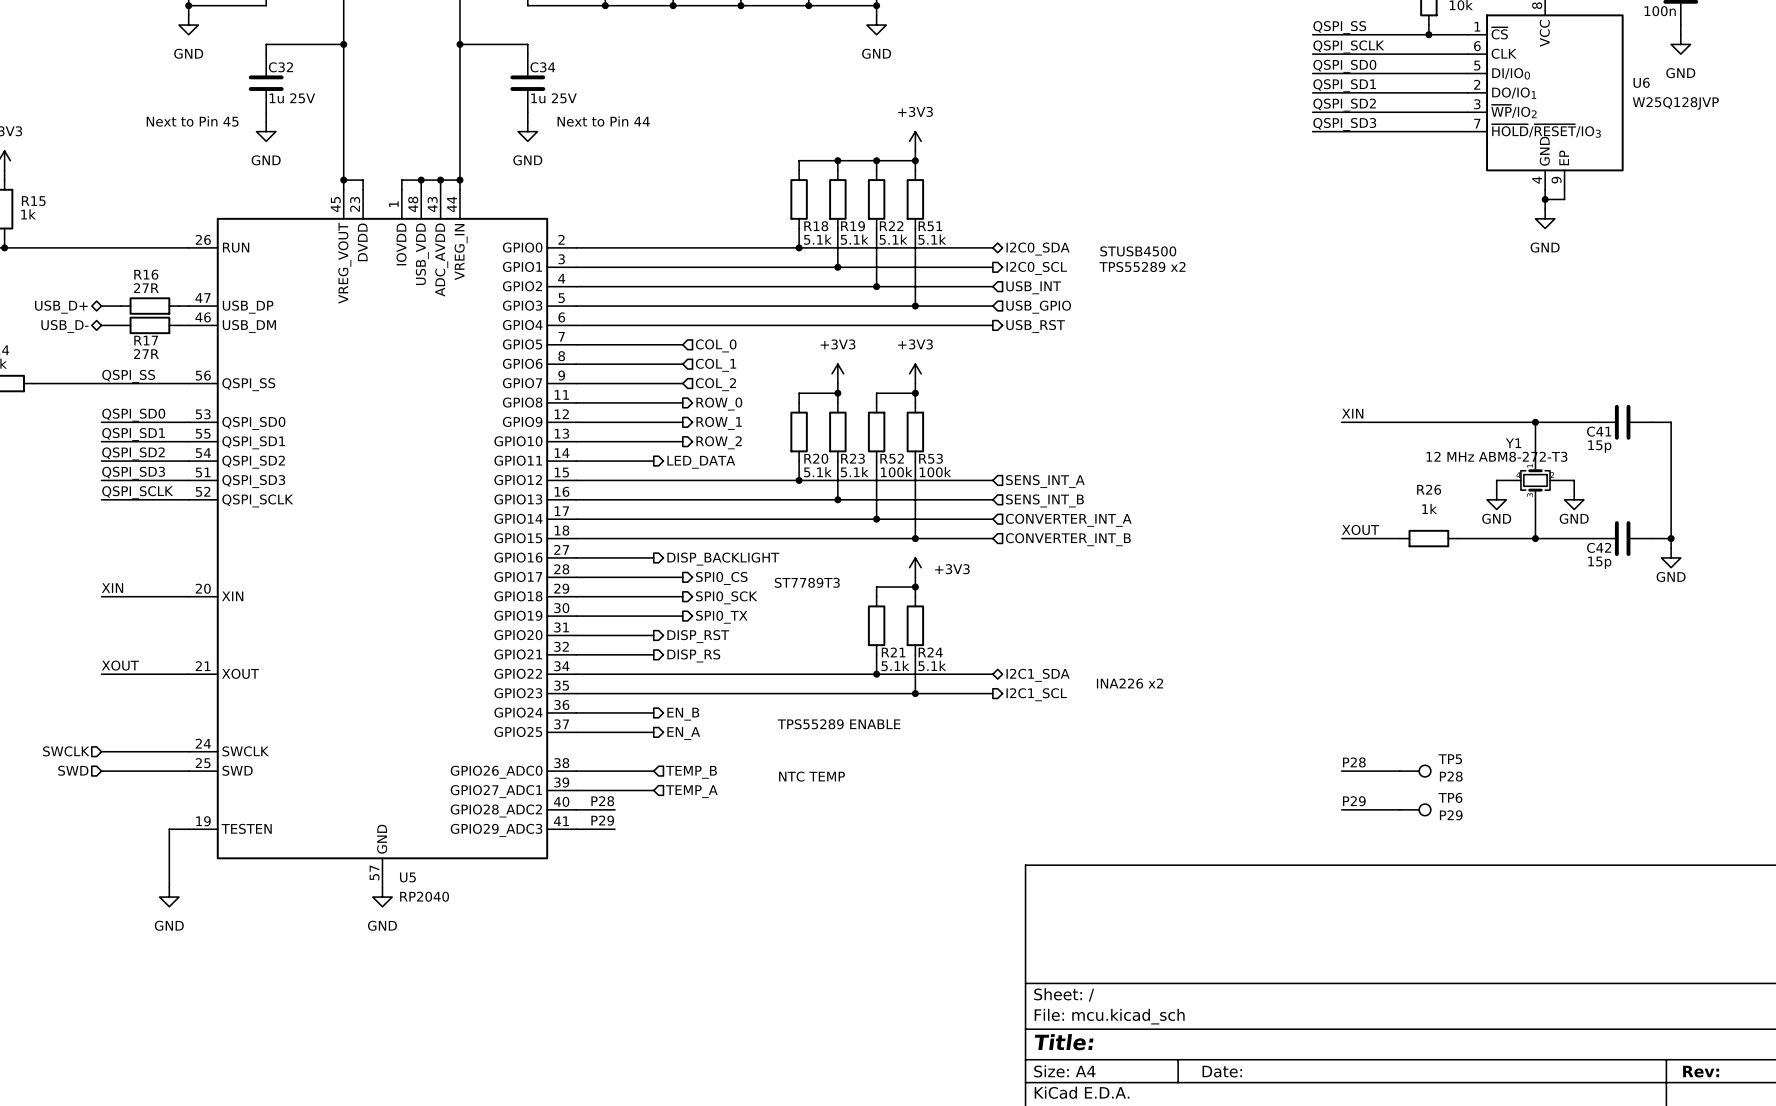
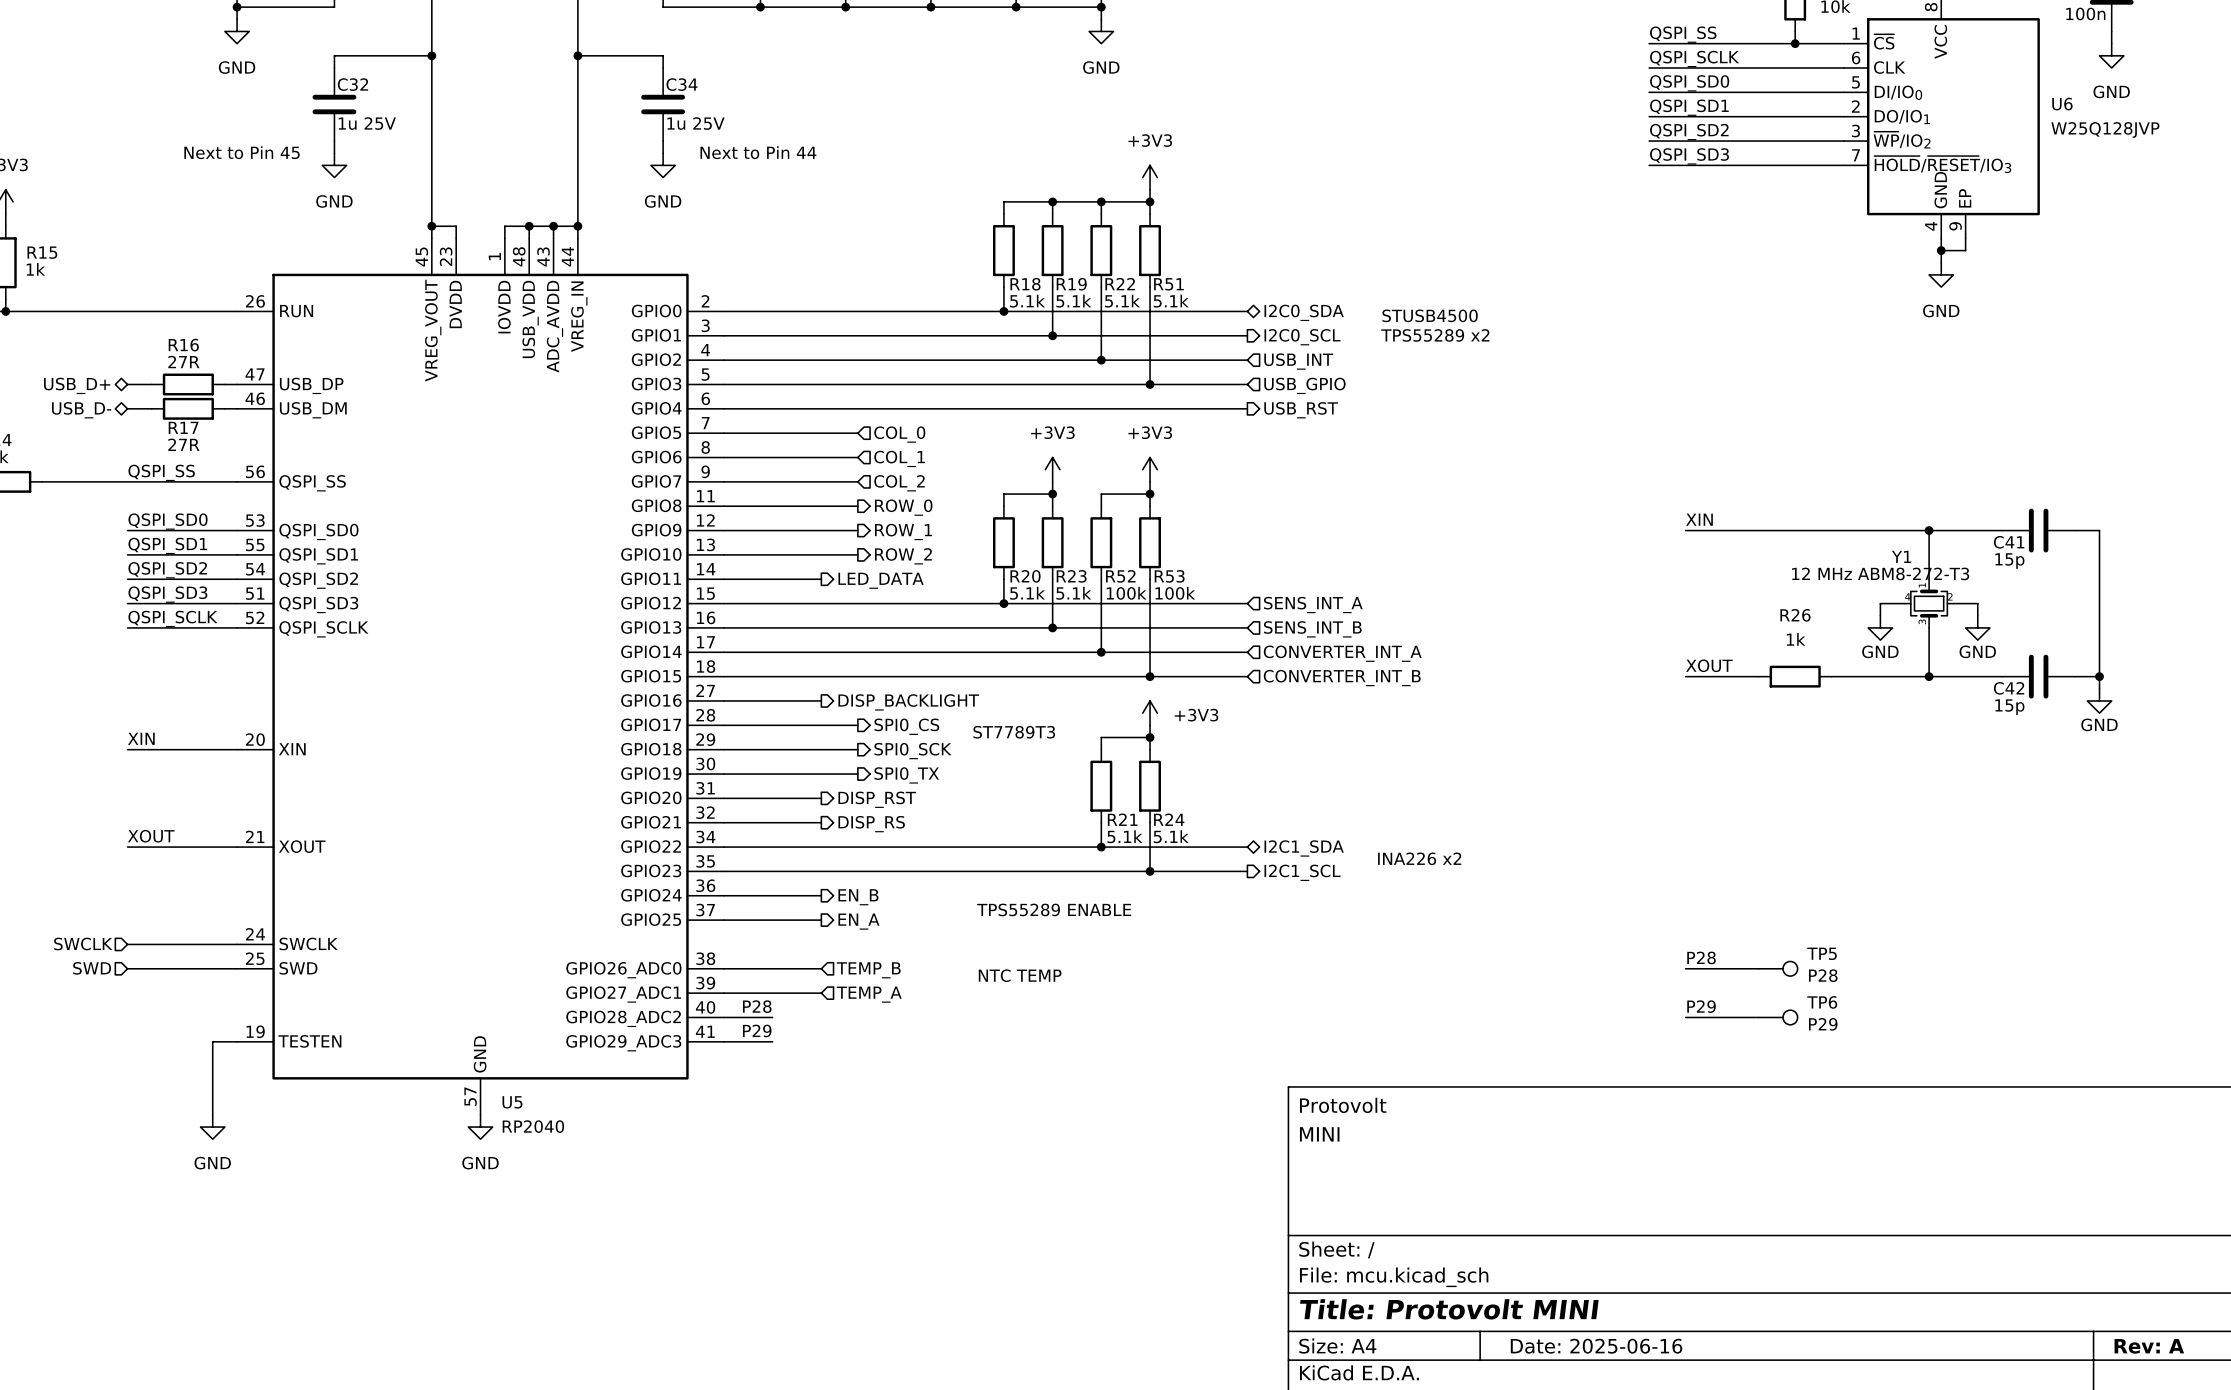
title block: none -> Protovolt (1343, 1105)
title block: none -> MINI (1319, 1134)
title block: Title: (1064, 1042) -> Title: Protovolt MINI (1449, 1309)
title block: Date: (1222, 1071) -> Date: 2025-06-16 (1596, 1346)
title block: Rev: (1701, 1071) -> Rev: A (2149, 1346)

